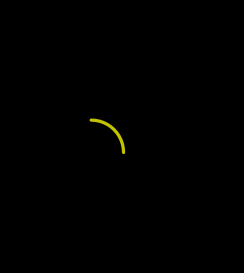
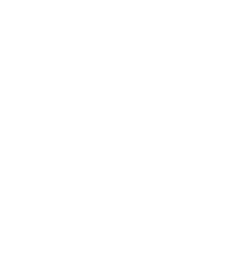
board edge: (91, 120) (103, 122) (114, 129) (121, 140) (123, 152) -> none

